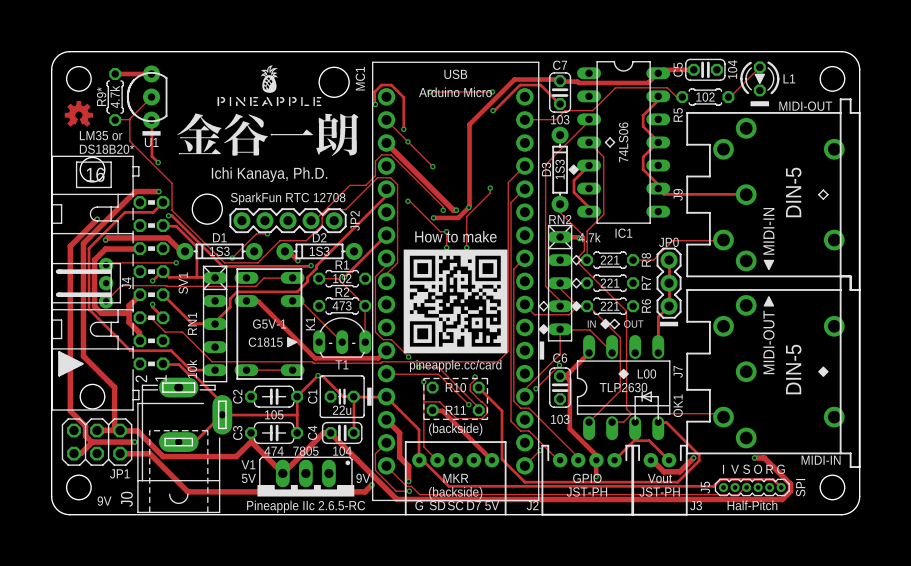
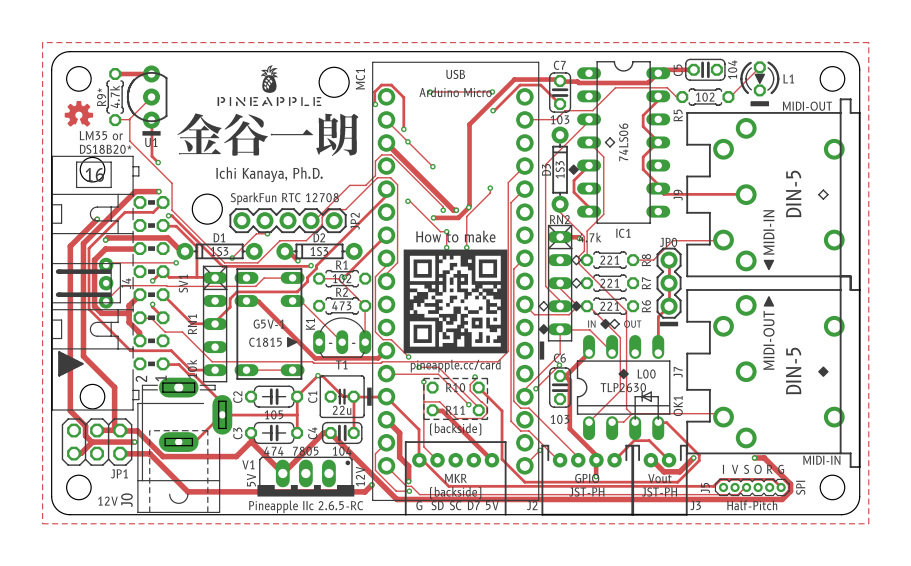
zone outline: none -> (42, 42) (868, 42) (868, 523) (42, 523) (42, 42)
text: none -> 12V (360, 476)
text rotation: 0° (248, 478) -> 90° counterclockwise (251, 480)
text: 9V (363, 478) -> none
text: 9V (104, 501) -> 12V (107, 501)

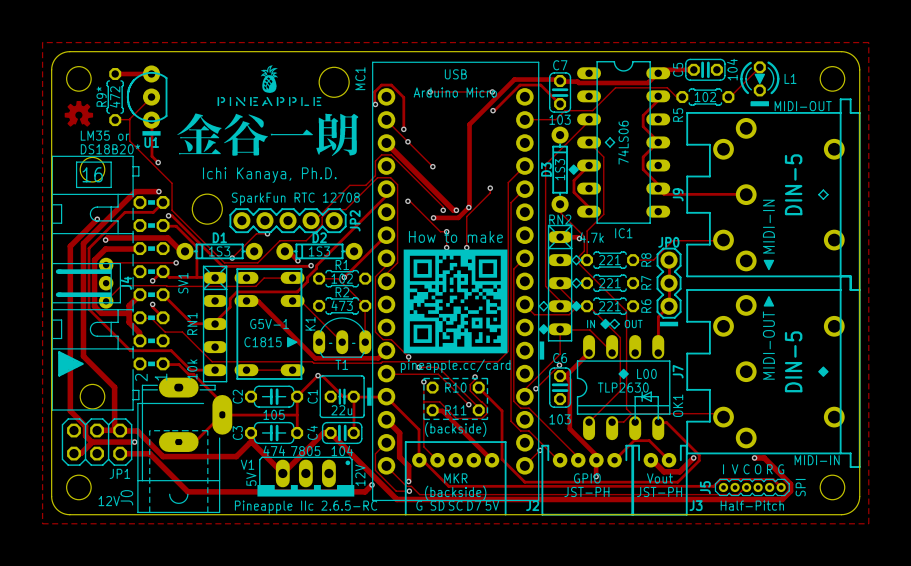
text: 4.7k (114, 96) -> 472 (114, 97)
text: S (746, 469) -> C (746, 469)

